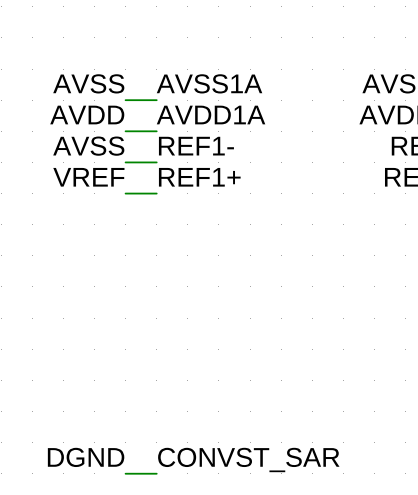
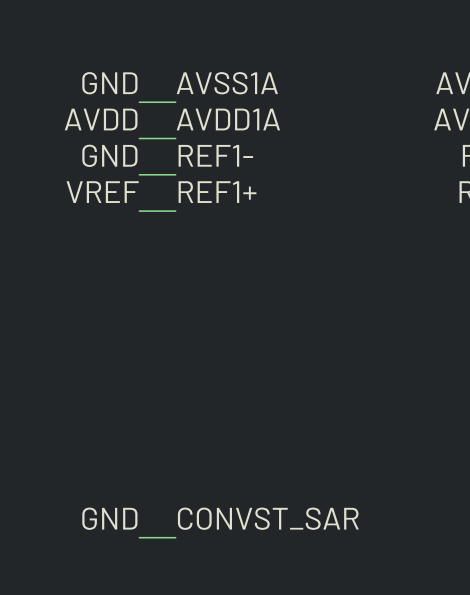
label: AVSS (88, 83) -> GND (109, 83)
label: AVSS (88, 146) -> GND (109, 155)
label: DGND (86, 457) -> GND (109, 518)

